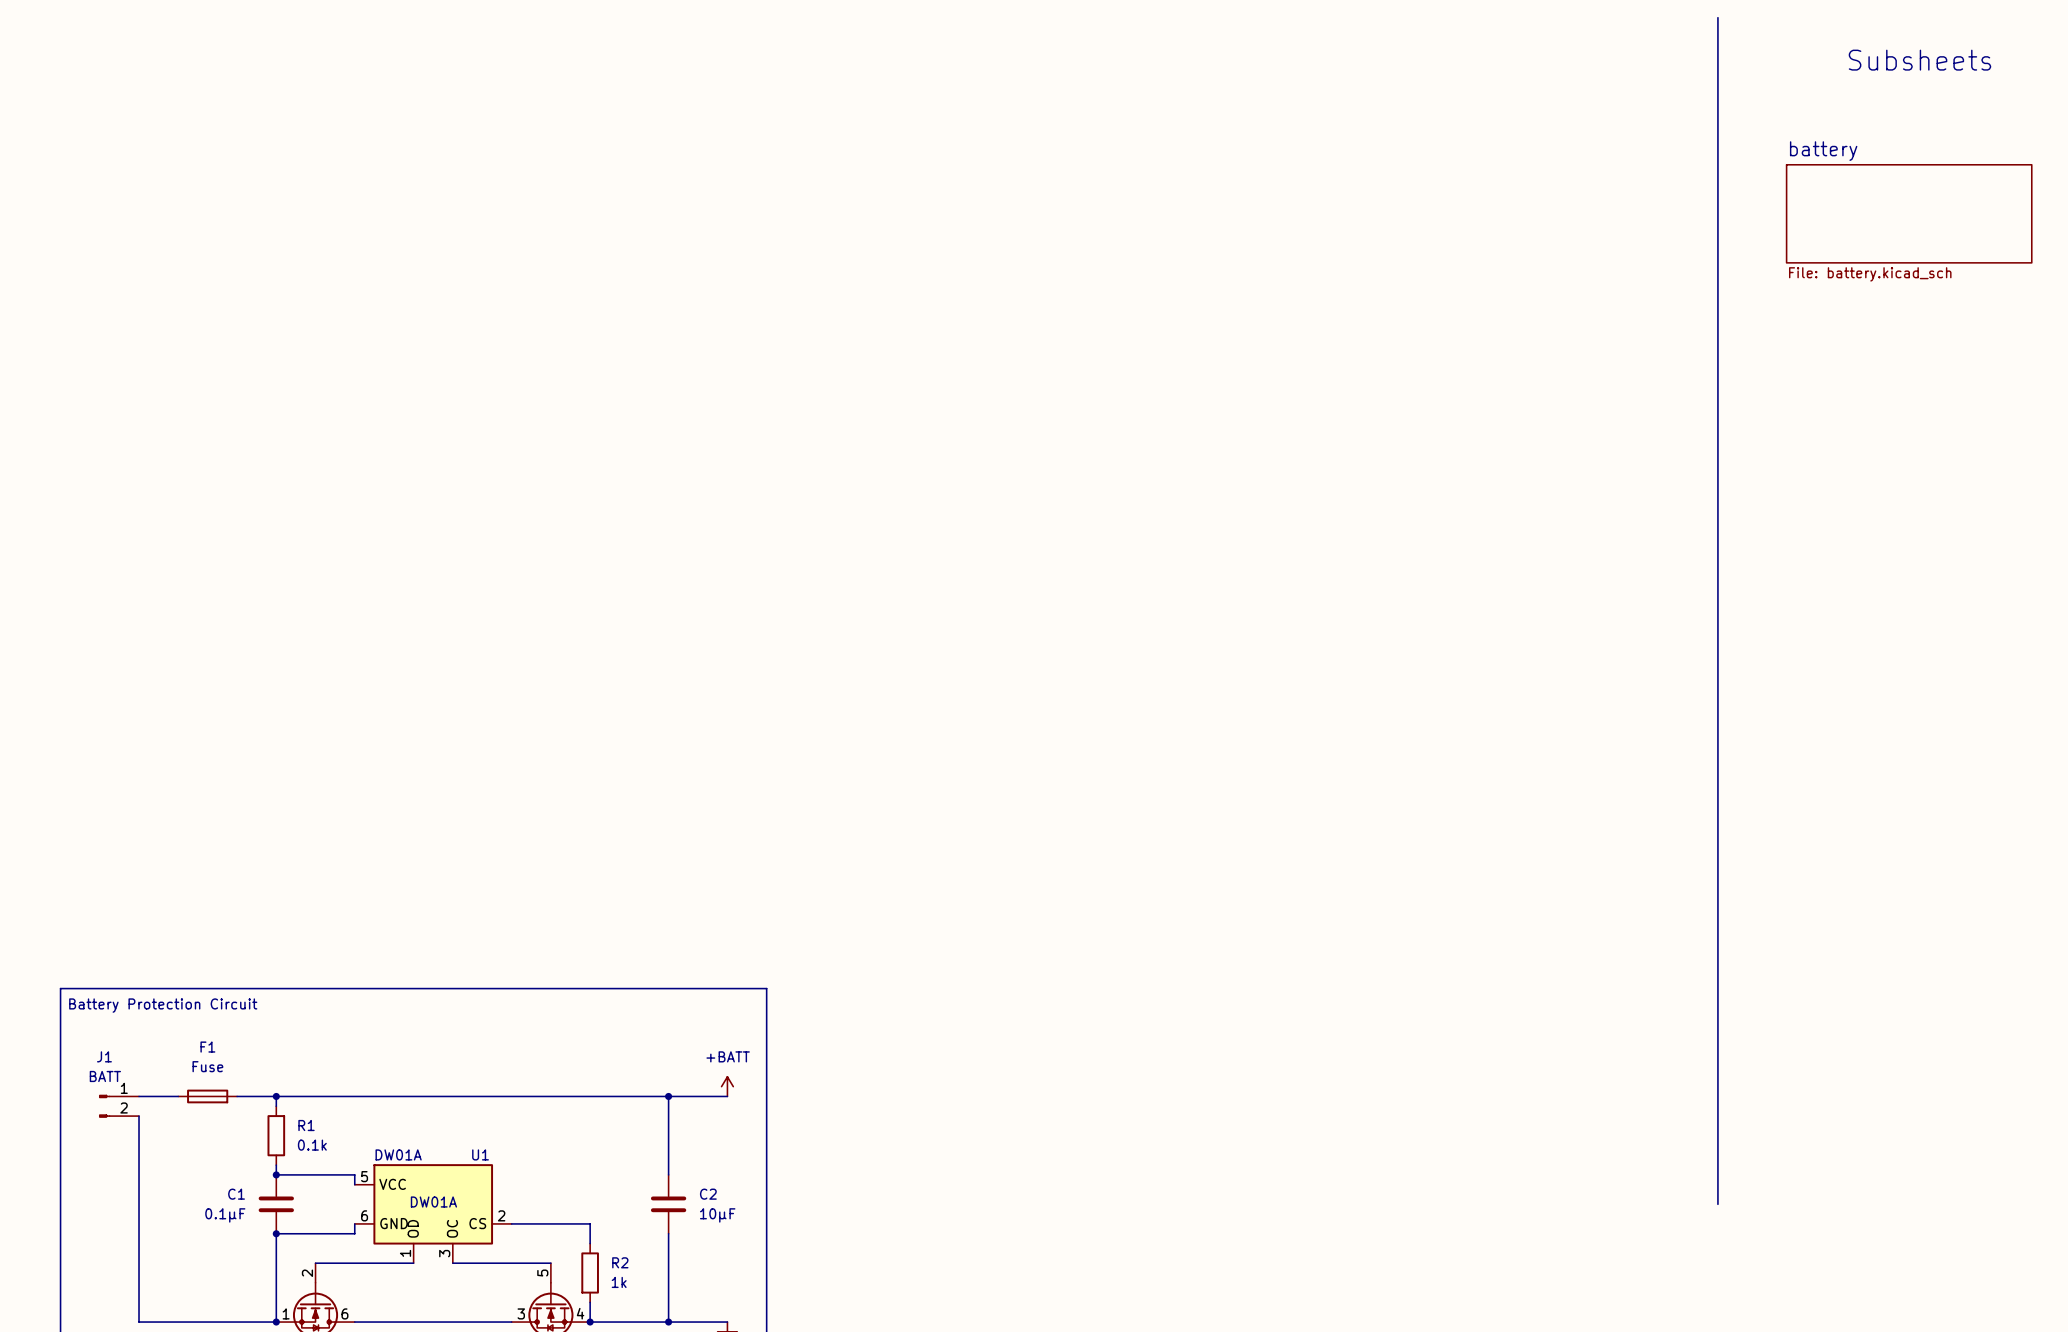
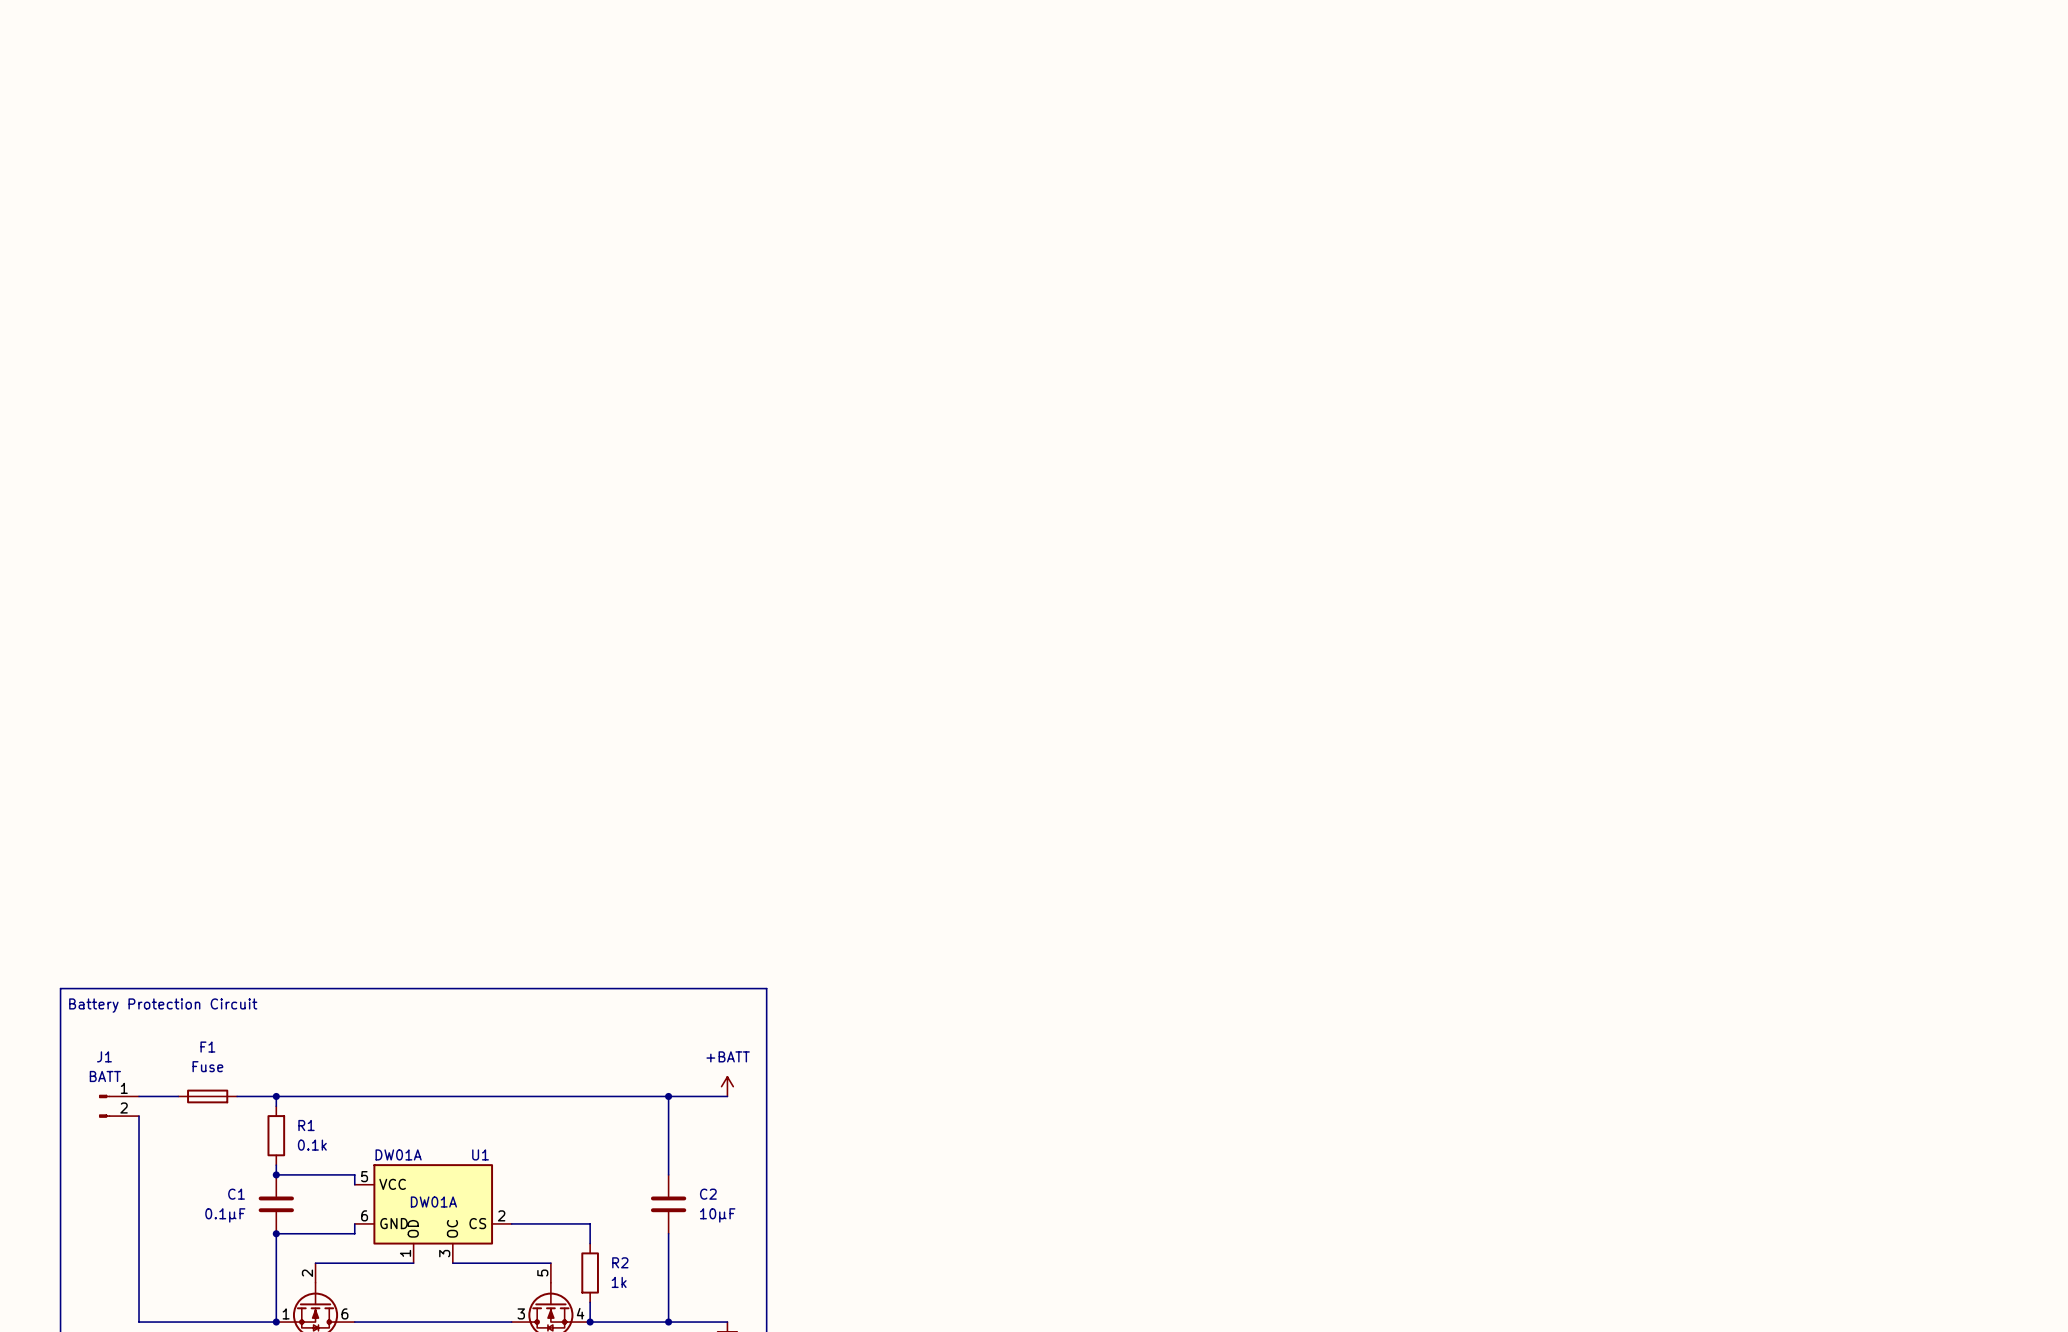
line: (1717, 17) (1717, 1204) -> none
text: Subsheets (1919, 60) -> none
sheet battery: File: battery.kicad_sch (1909, 213) -> none

